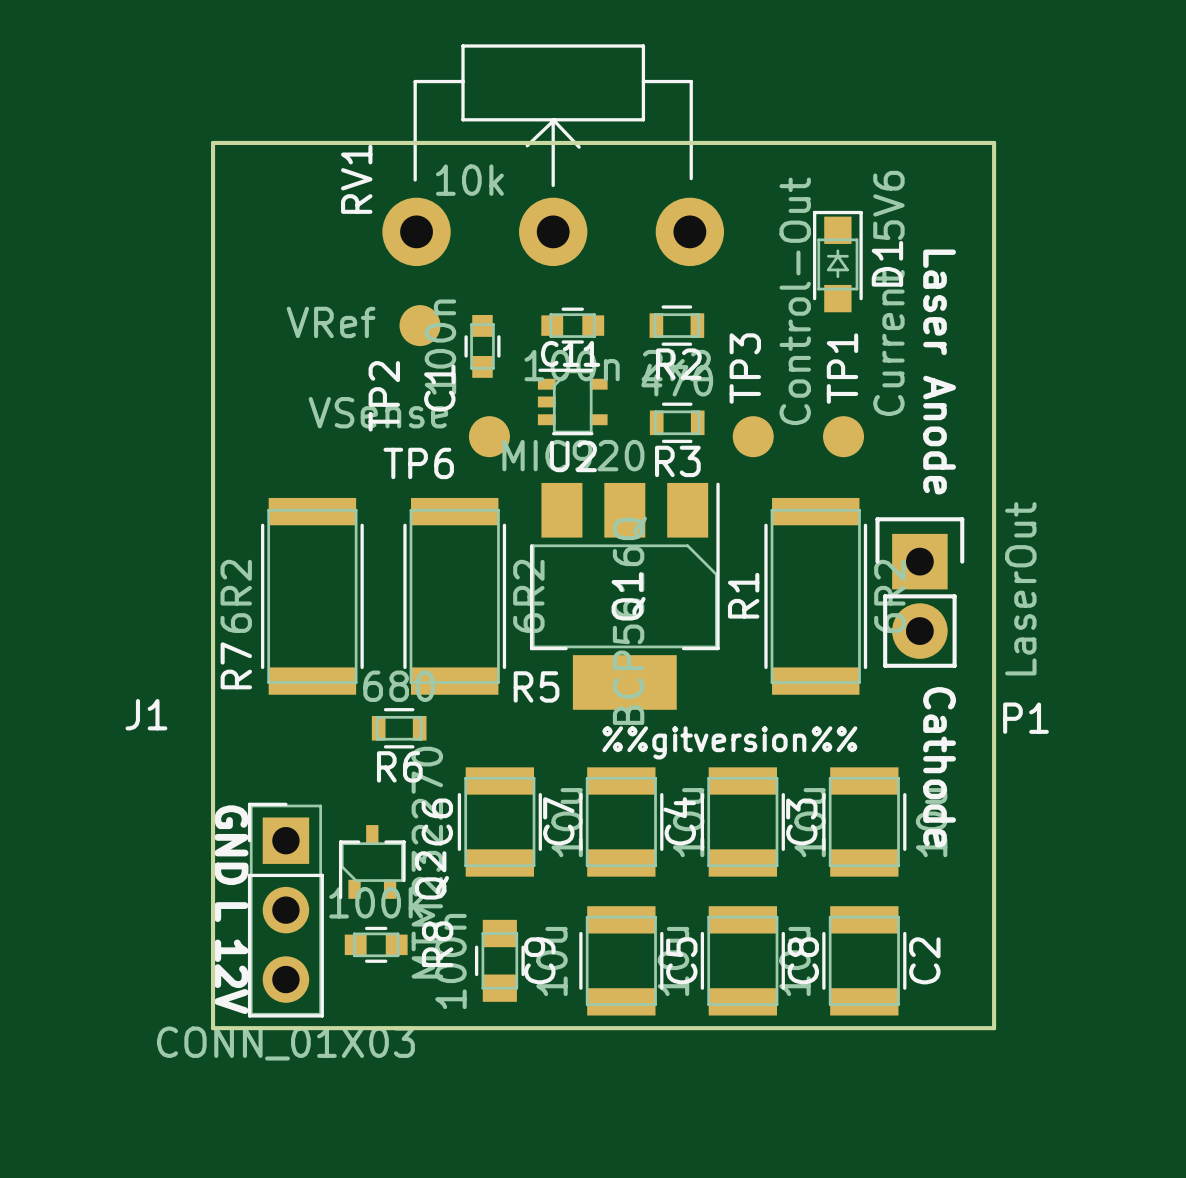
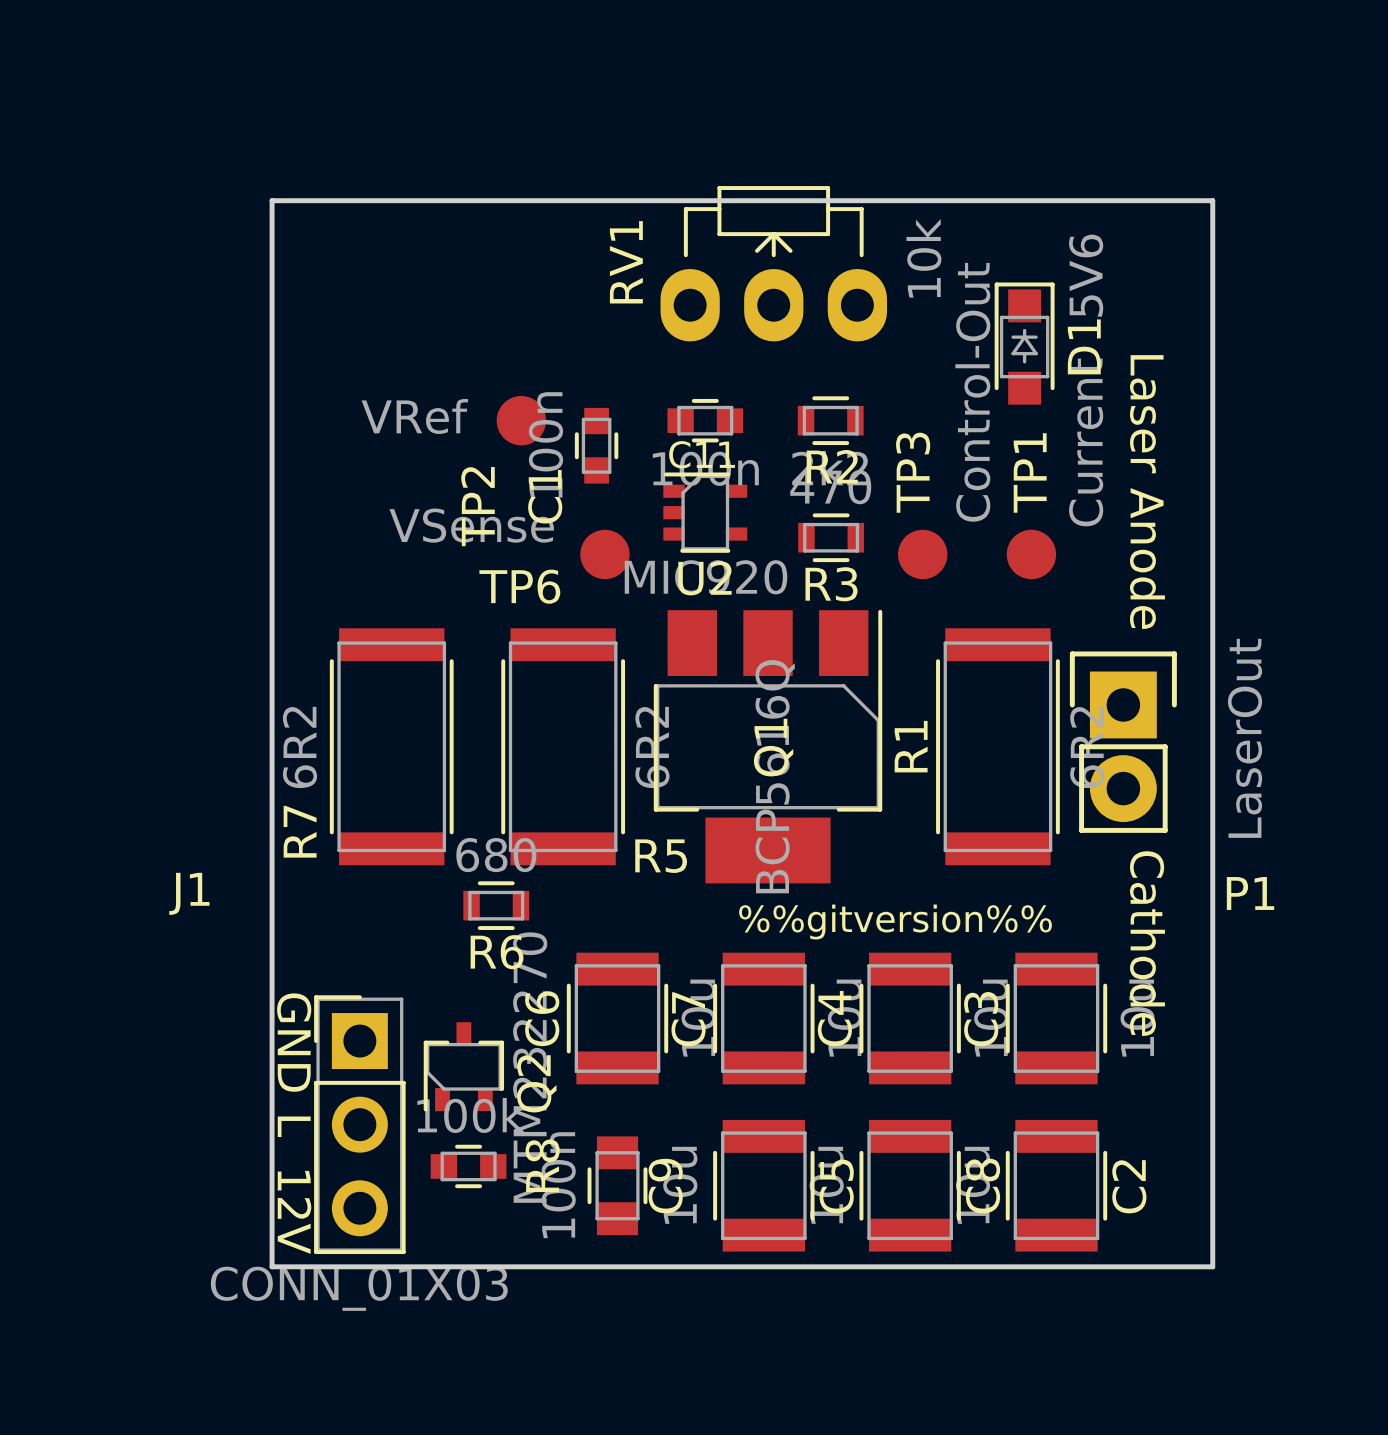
RV1 footprint: [382, 44, 725, 267] -> [660, 186, 888, 342]
RV1 name position: RV1 (356, 179) -> RV1 (626, 262)
RV1 value position: 10k (469, 180) -> 10k (923, 258)

